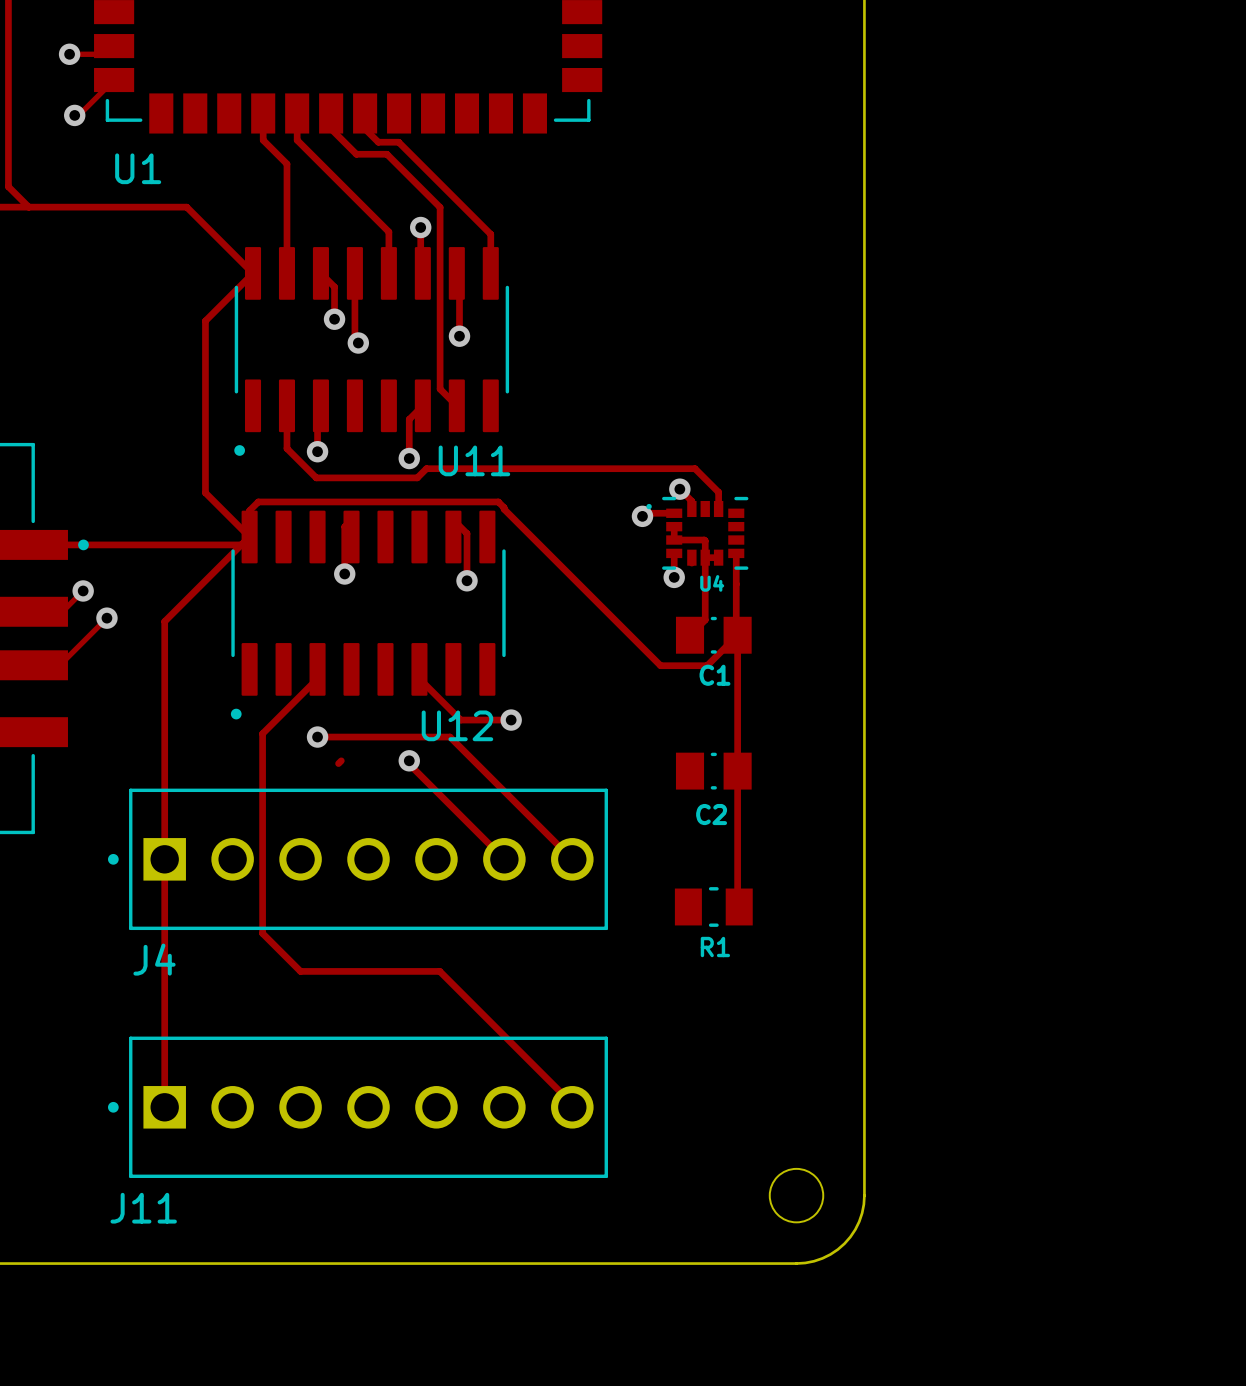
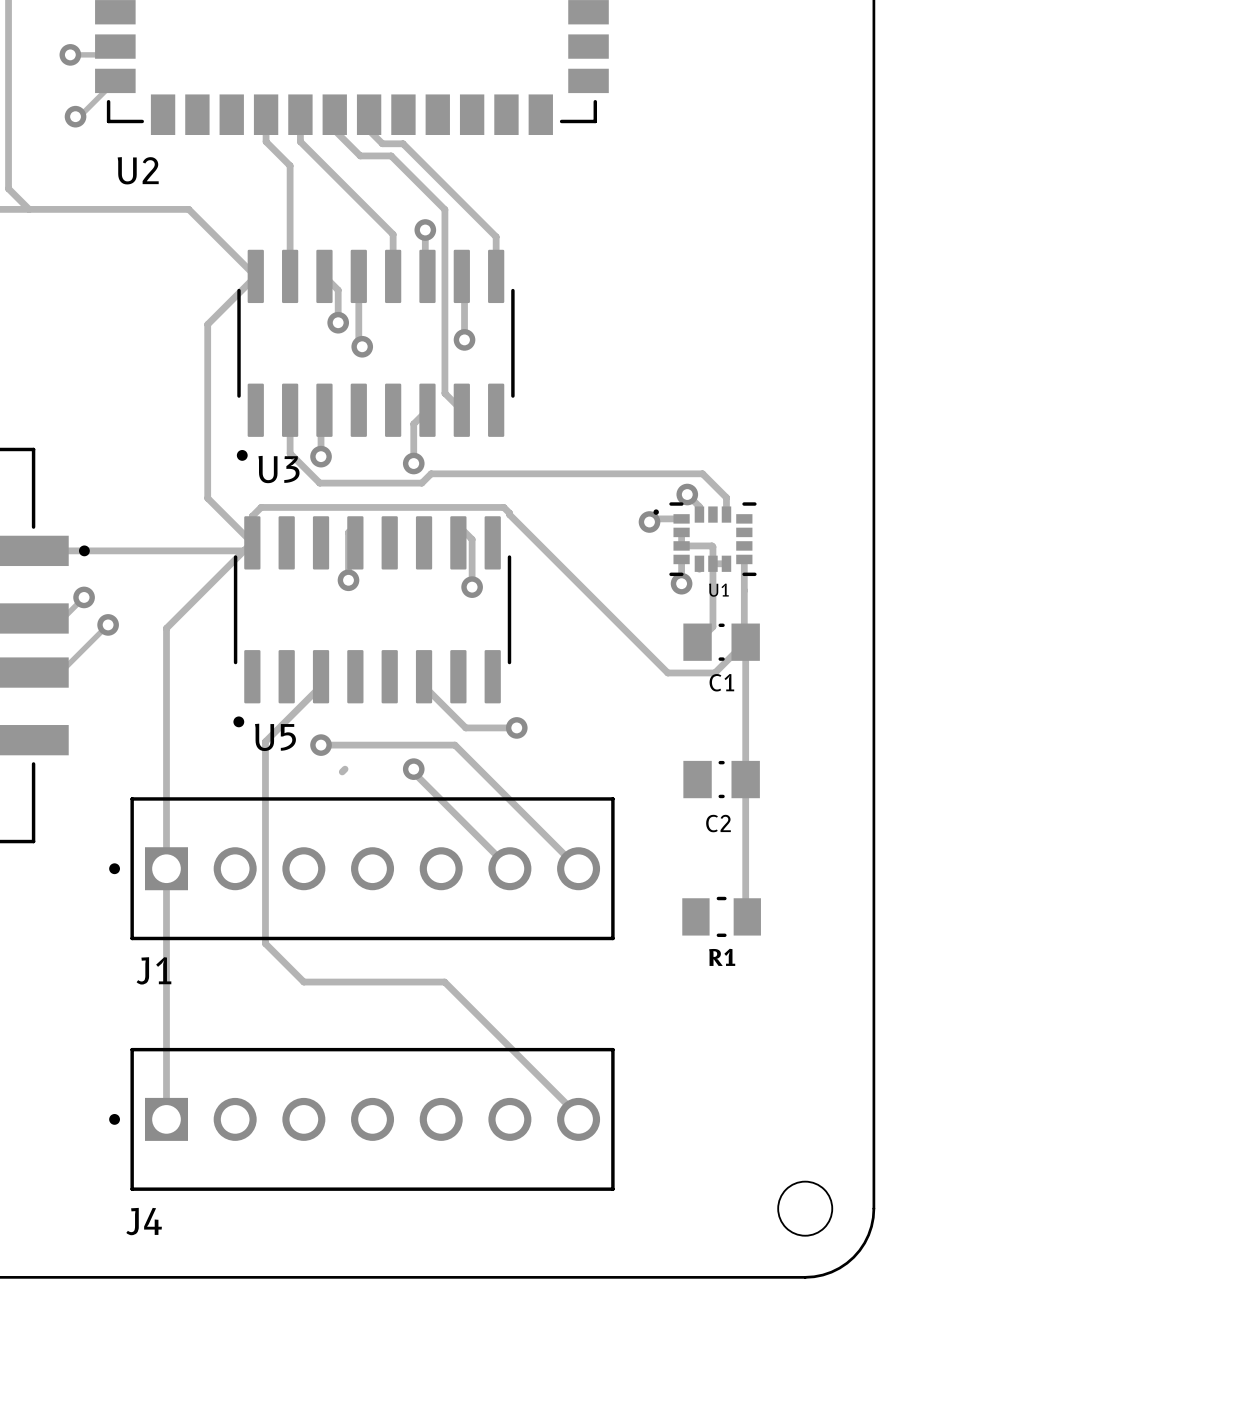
U1 name: U1 (138, 168) -> U2 (138, 170)
U11 name: U11 (474, 460) -> U3 (279, 469)
U4 name: U4 (712, 583) -> U1 (718, 590)
U12 name: U12 (457, 725) -> U5 (275, 737)
J4 name: J4 (154, 959) -> J1 (153, 970)
J11 name: J11 (143, 1208) -> J4 (144, 1221)

